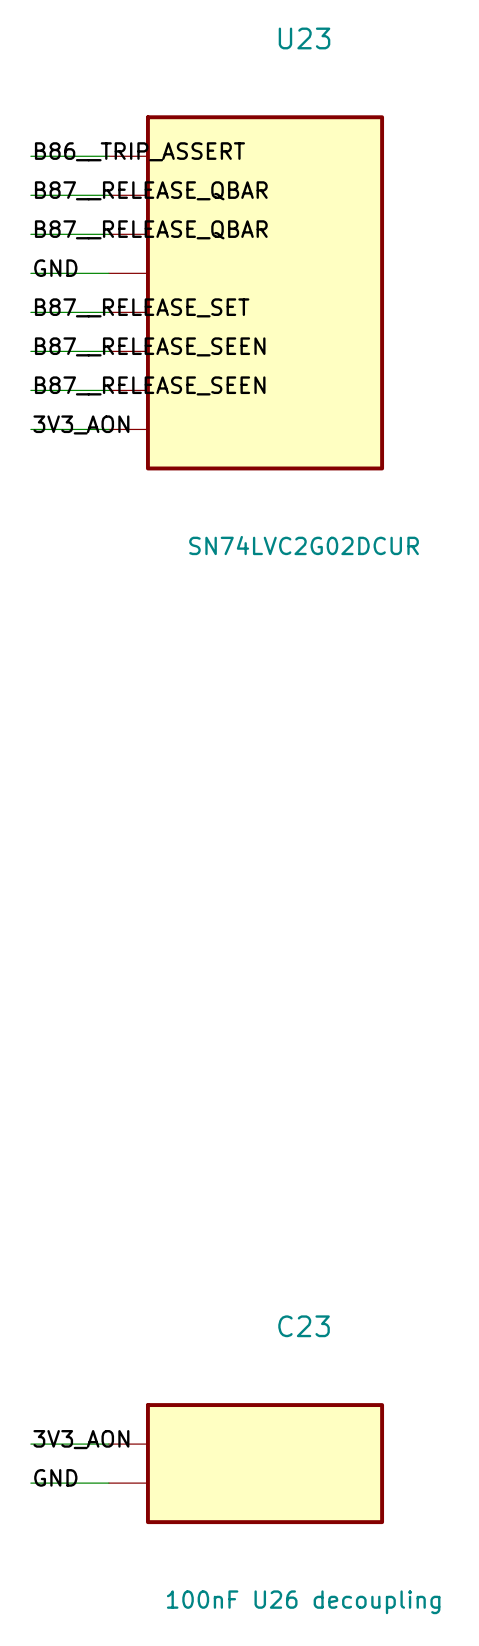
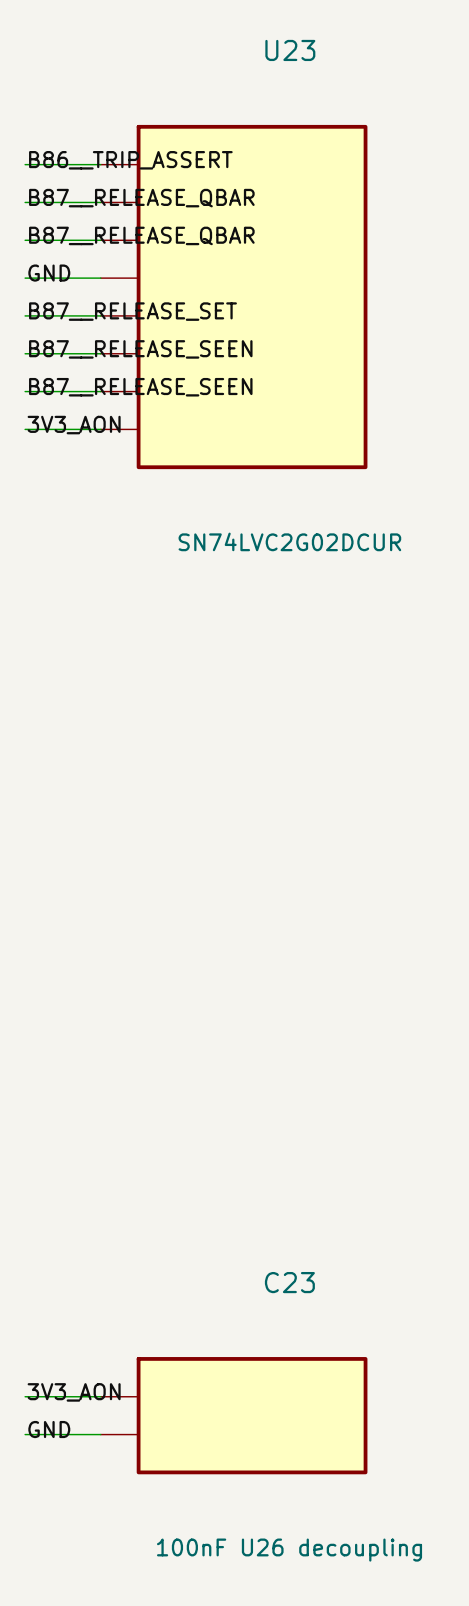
label position: 3V3_AON (81, 1439) -> 3V3_AON (74, 1392)
wire: (30, 1444) (108, 1444) -> (25, 1396) (100, 1396)
C23 position: (246, 1463) -> (234, 1415)
label position: GND (55, 1477) -> GND (49, 1429)
wire: (30, 1483) (108, 1483) -> (25, 1434) (100, 1434)

